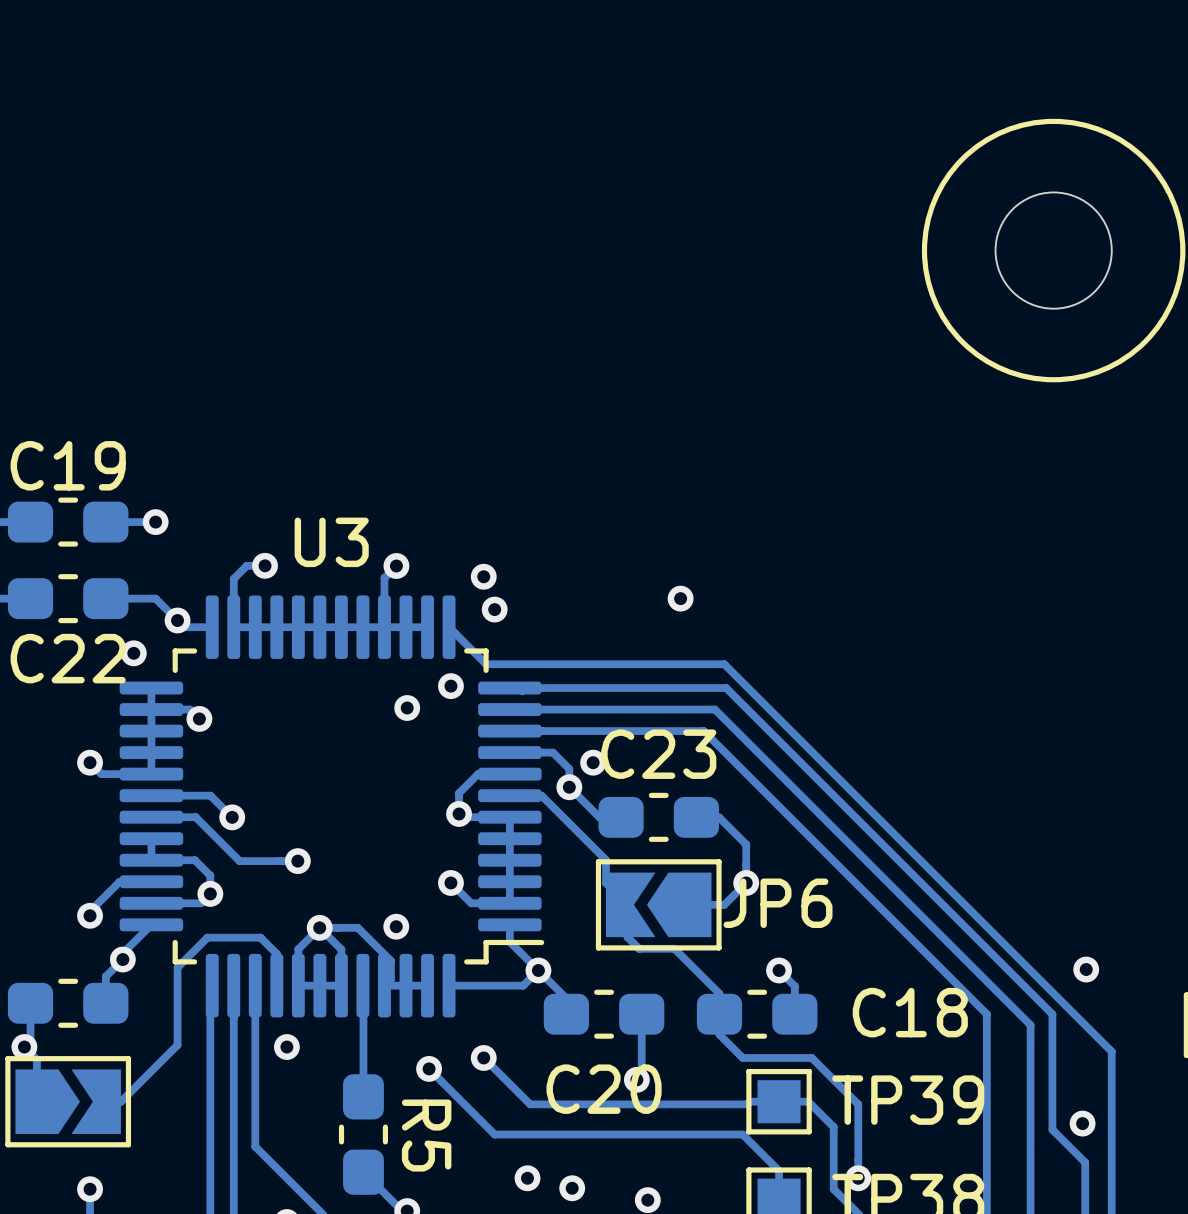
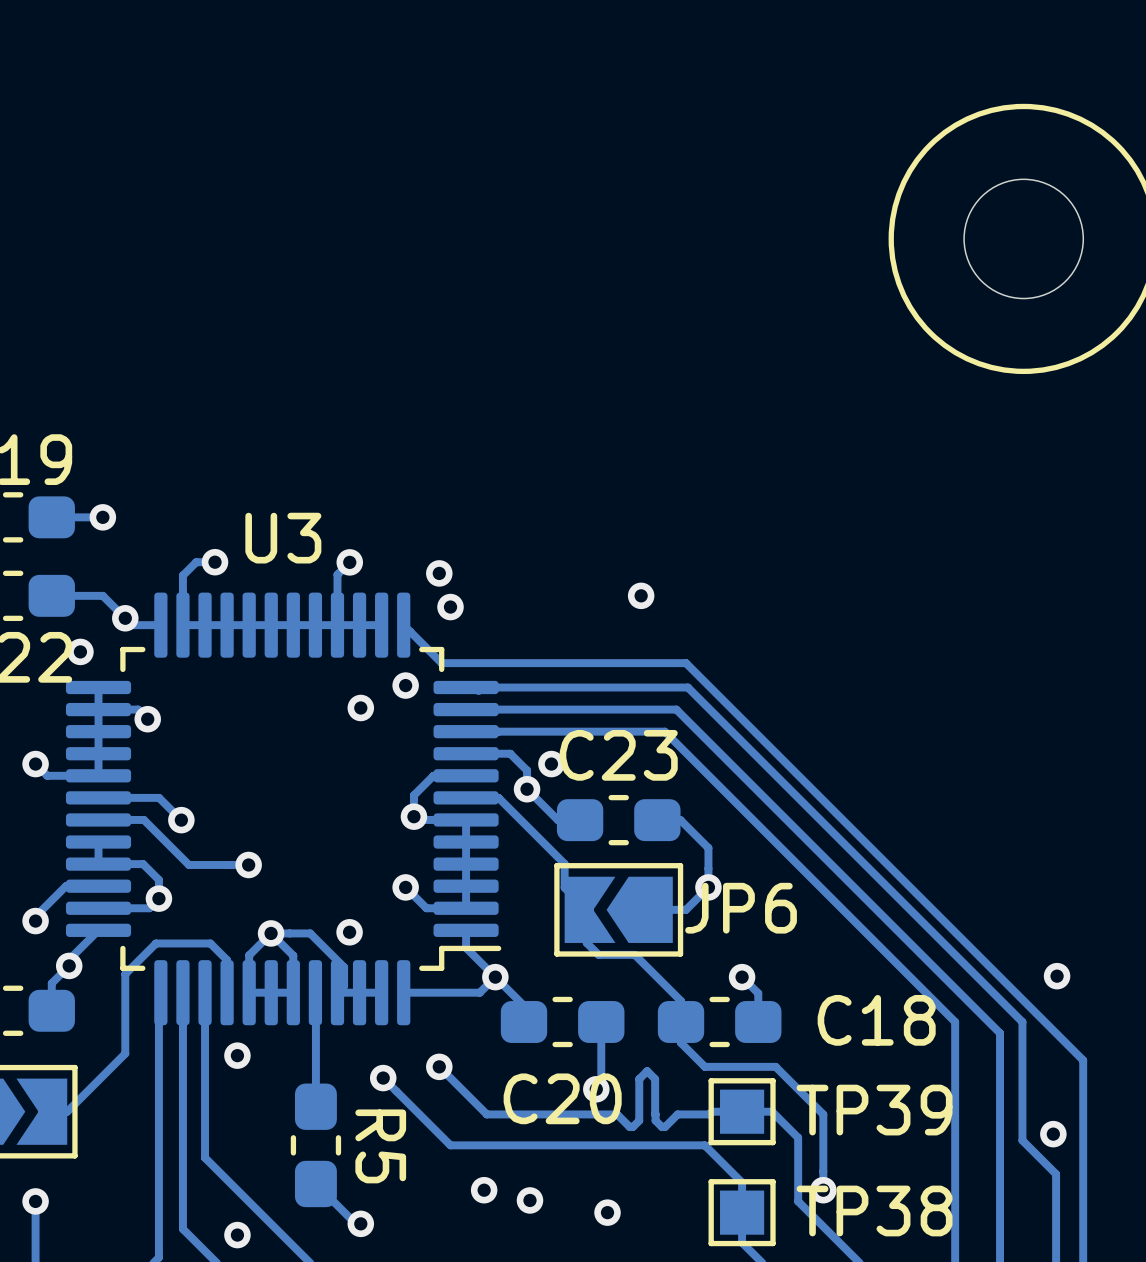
track: (716, 1104) (657, 1104) -> (655, 1114) (655, 1079) (647, 1071) (639, 1079) (639, 1120) (633, 1126) (629, 1126) (617, 1114)
track: none -> (677, 1114) (665, 1126) (661, 1126) (655, 1120) (655, 1114)

